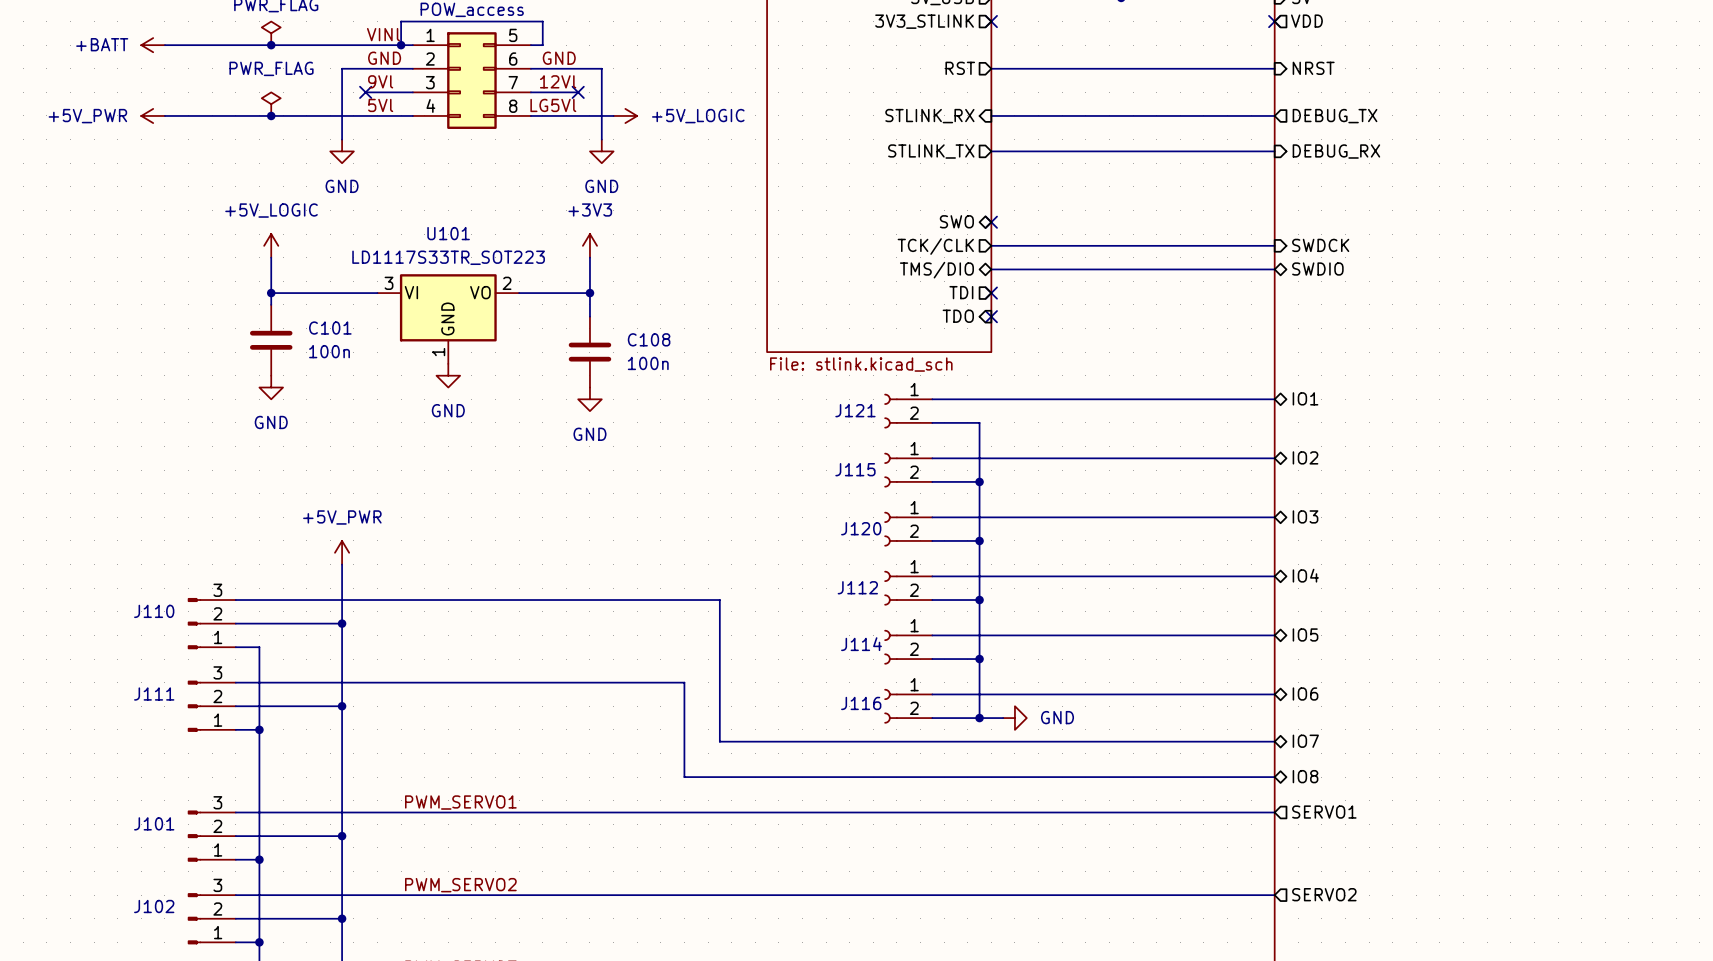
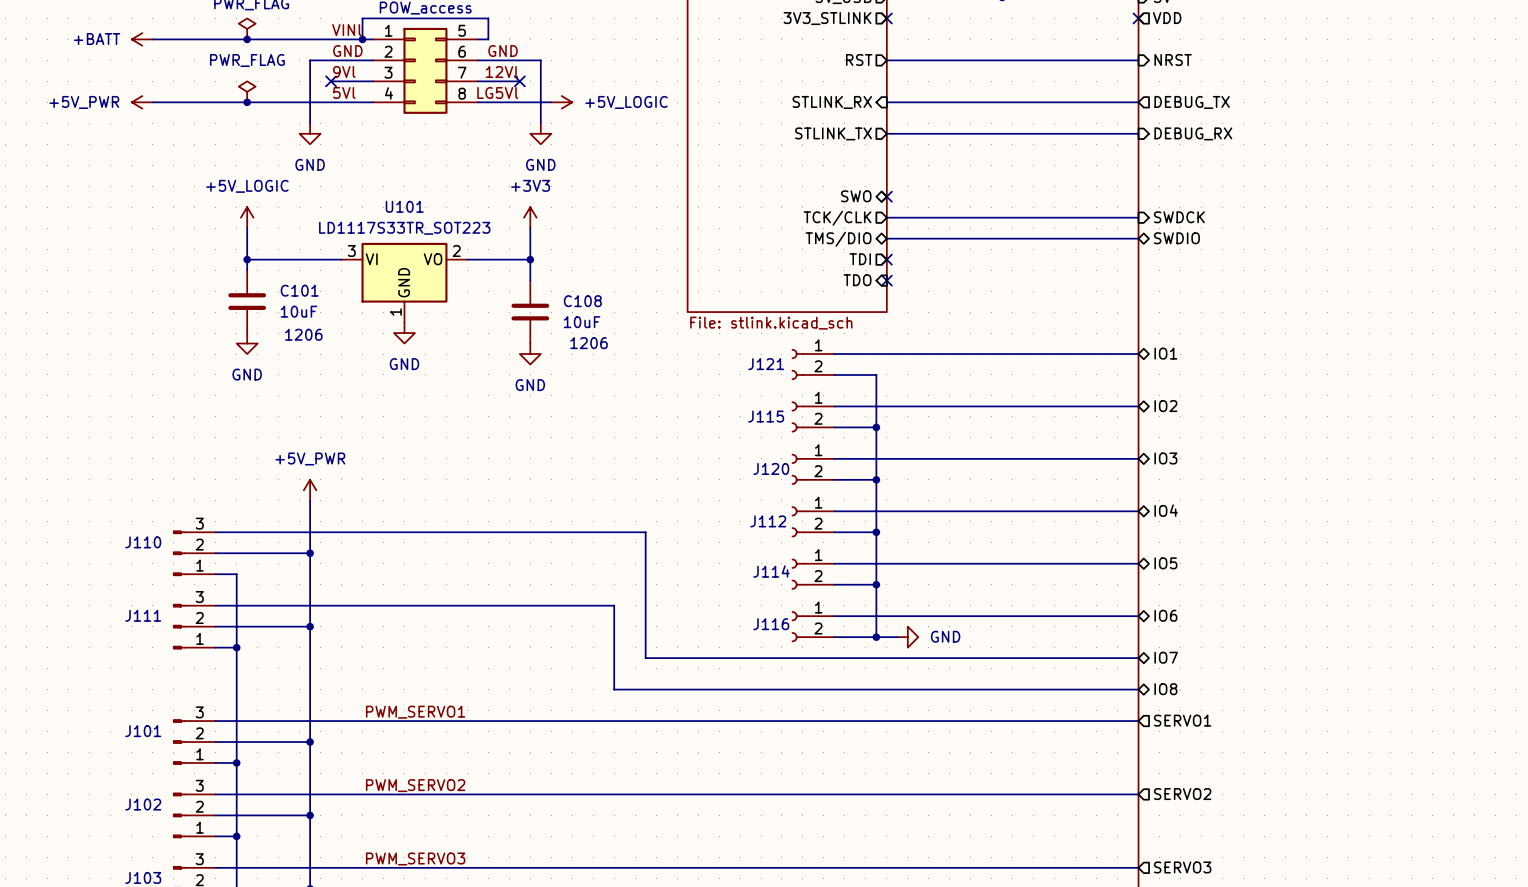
C101 value: 100n (329, 351) -> 10uF (298, 311)
C108 value: 100n (648, 363) -> 10uF (582, 322)
C101 text: none -> 1206 (303, 334)
C108 text: none -> 1206 (589, 343)

